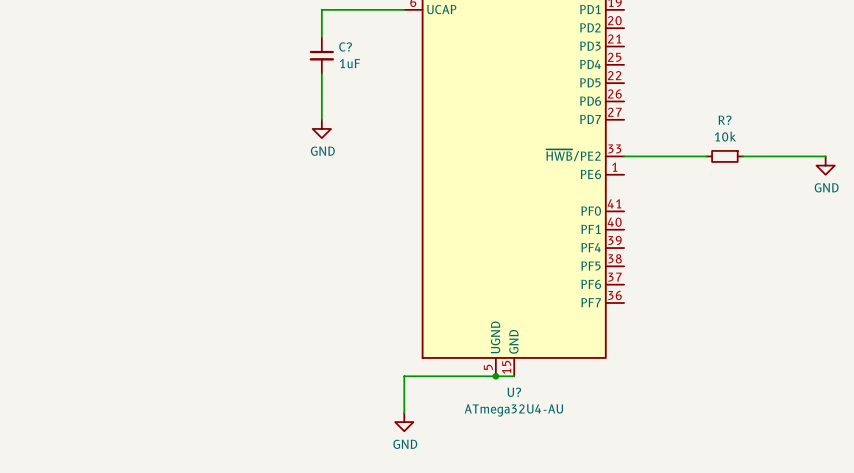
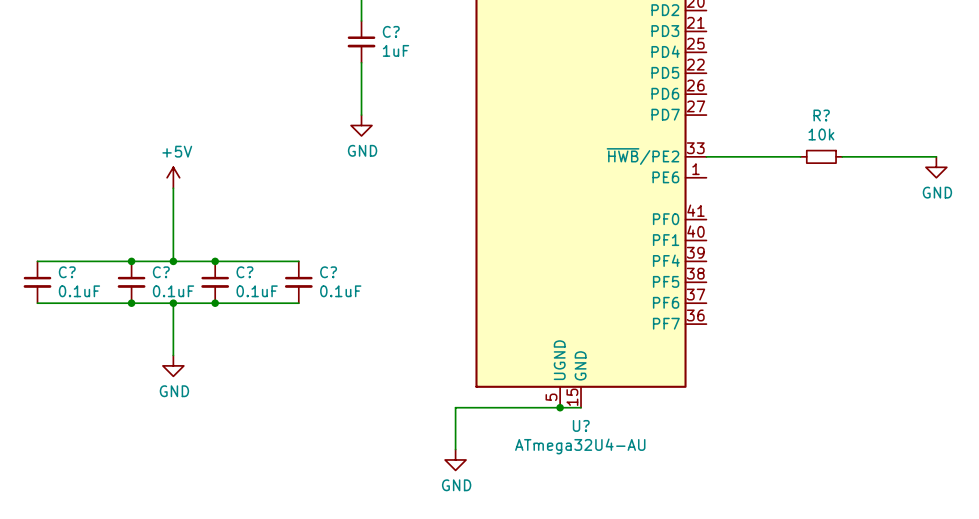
power symbol: none -> +5V (173, 177)
wire: none -> (173, 188) (173, 261)
wire: none -> (37, 261) (298, 261)
junction: none -> (131, 261)
junction: none -> (173, 261)
junction: none -> (215, 261)
C?: none -> 0.1uF (37, 282)
C?: none -> 0.1uF (131, 282)
C?: none -> 0.1uF (215, 282)
C?: none -> 0.1uF (298, 282)
wire: none -> (37, 303) (298, 303)
junction: none -> (131, 303)
wire: none -> (173, 303) (173, 355)
junction: none -> (173, 303)
junction: none -> (215, 303)
power symbol: none -> GND (173, 365)

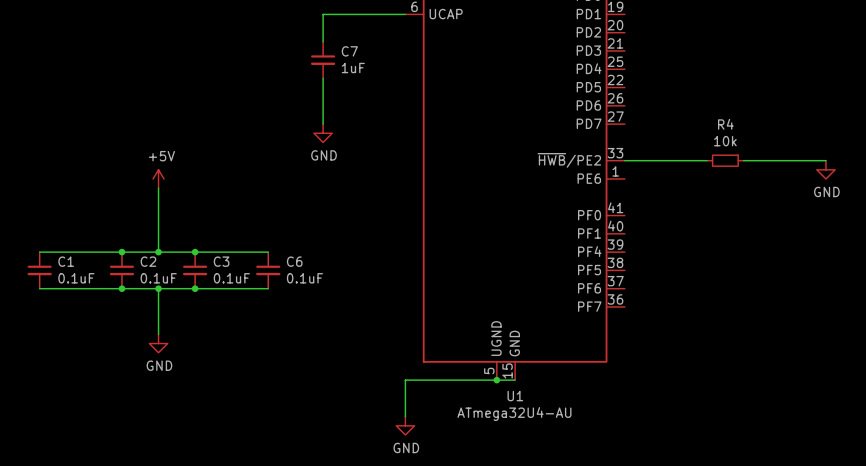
C? name: C? (391, 31) -> C7 (349, 51)
R? name: R? (821, 115) -> R4 (725, 124)
C? name: C? (67, 272) -> C1 (66, 261)
C? name: C? (161, 272) -> C2 (148, 261)
C? name: C? (244, 272) -> C3 (221, 261)
C? name: C? (328, 272) -> C6 (294, 261)
U? name: U? (581, 425) -> U1 (515, 396)

